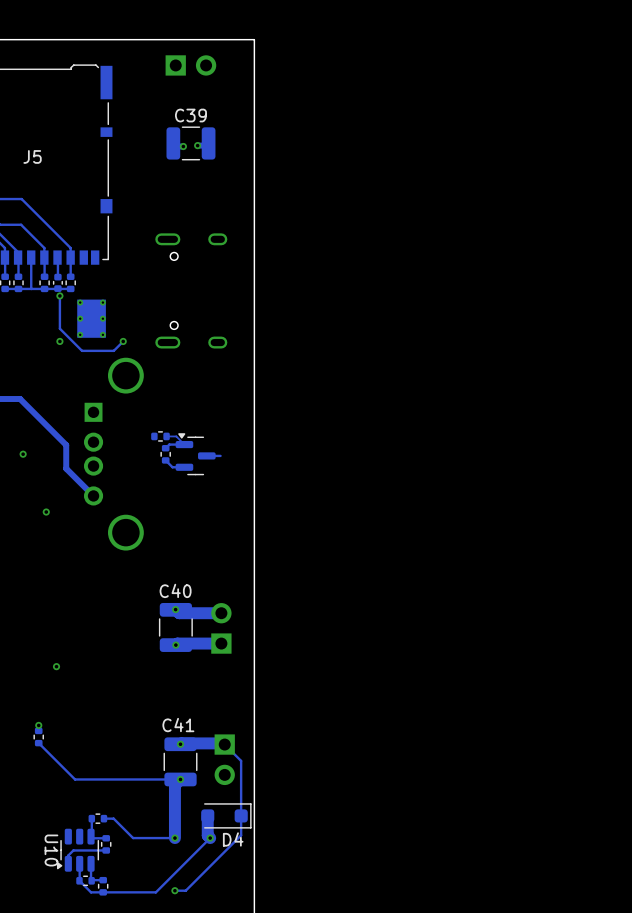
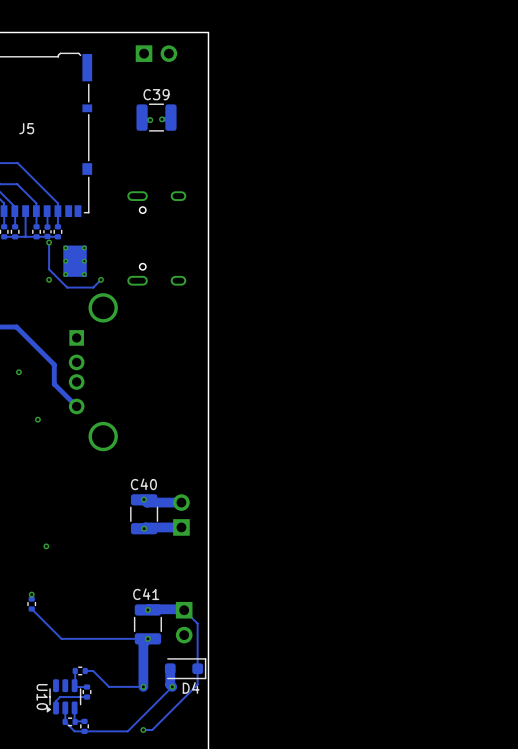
part: (160, 436) -> none
track: (166, 436) (176, 436) (184, 444) (169, 444) (165, 448) -> none
part: (165, 454) -> none
part: (195, 454) -> none
track: (220, 455) (206, 455) -> none
track: (165, 460) (172, 467) (184, 467) -> none

